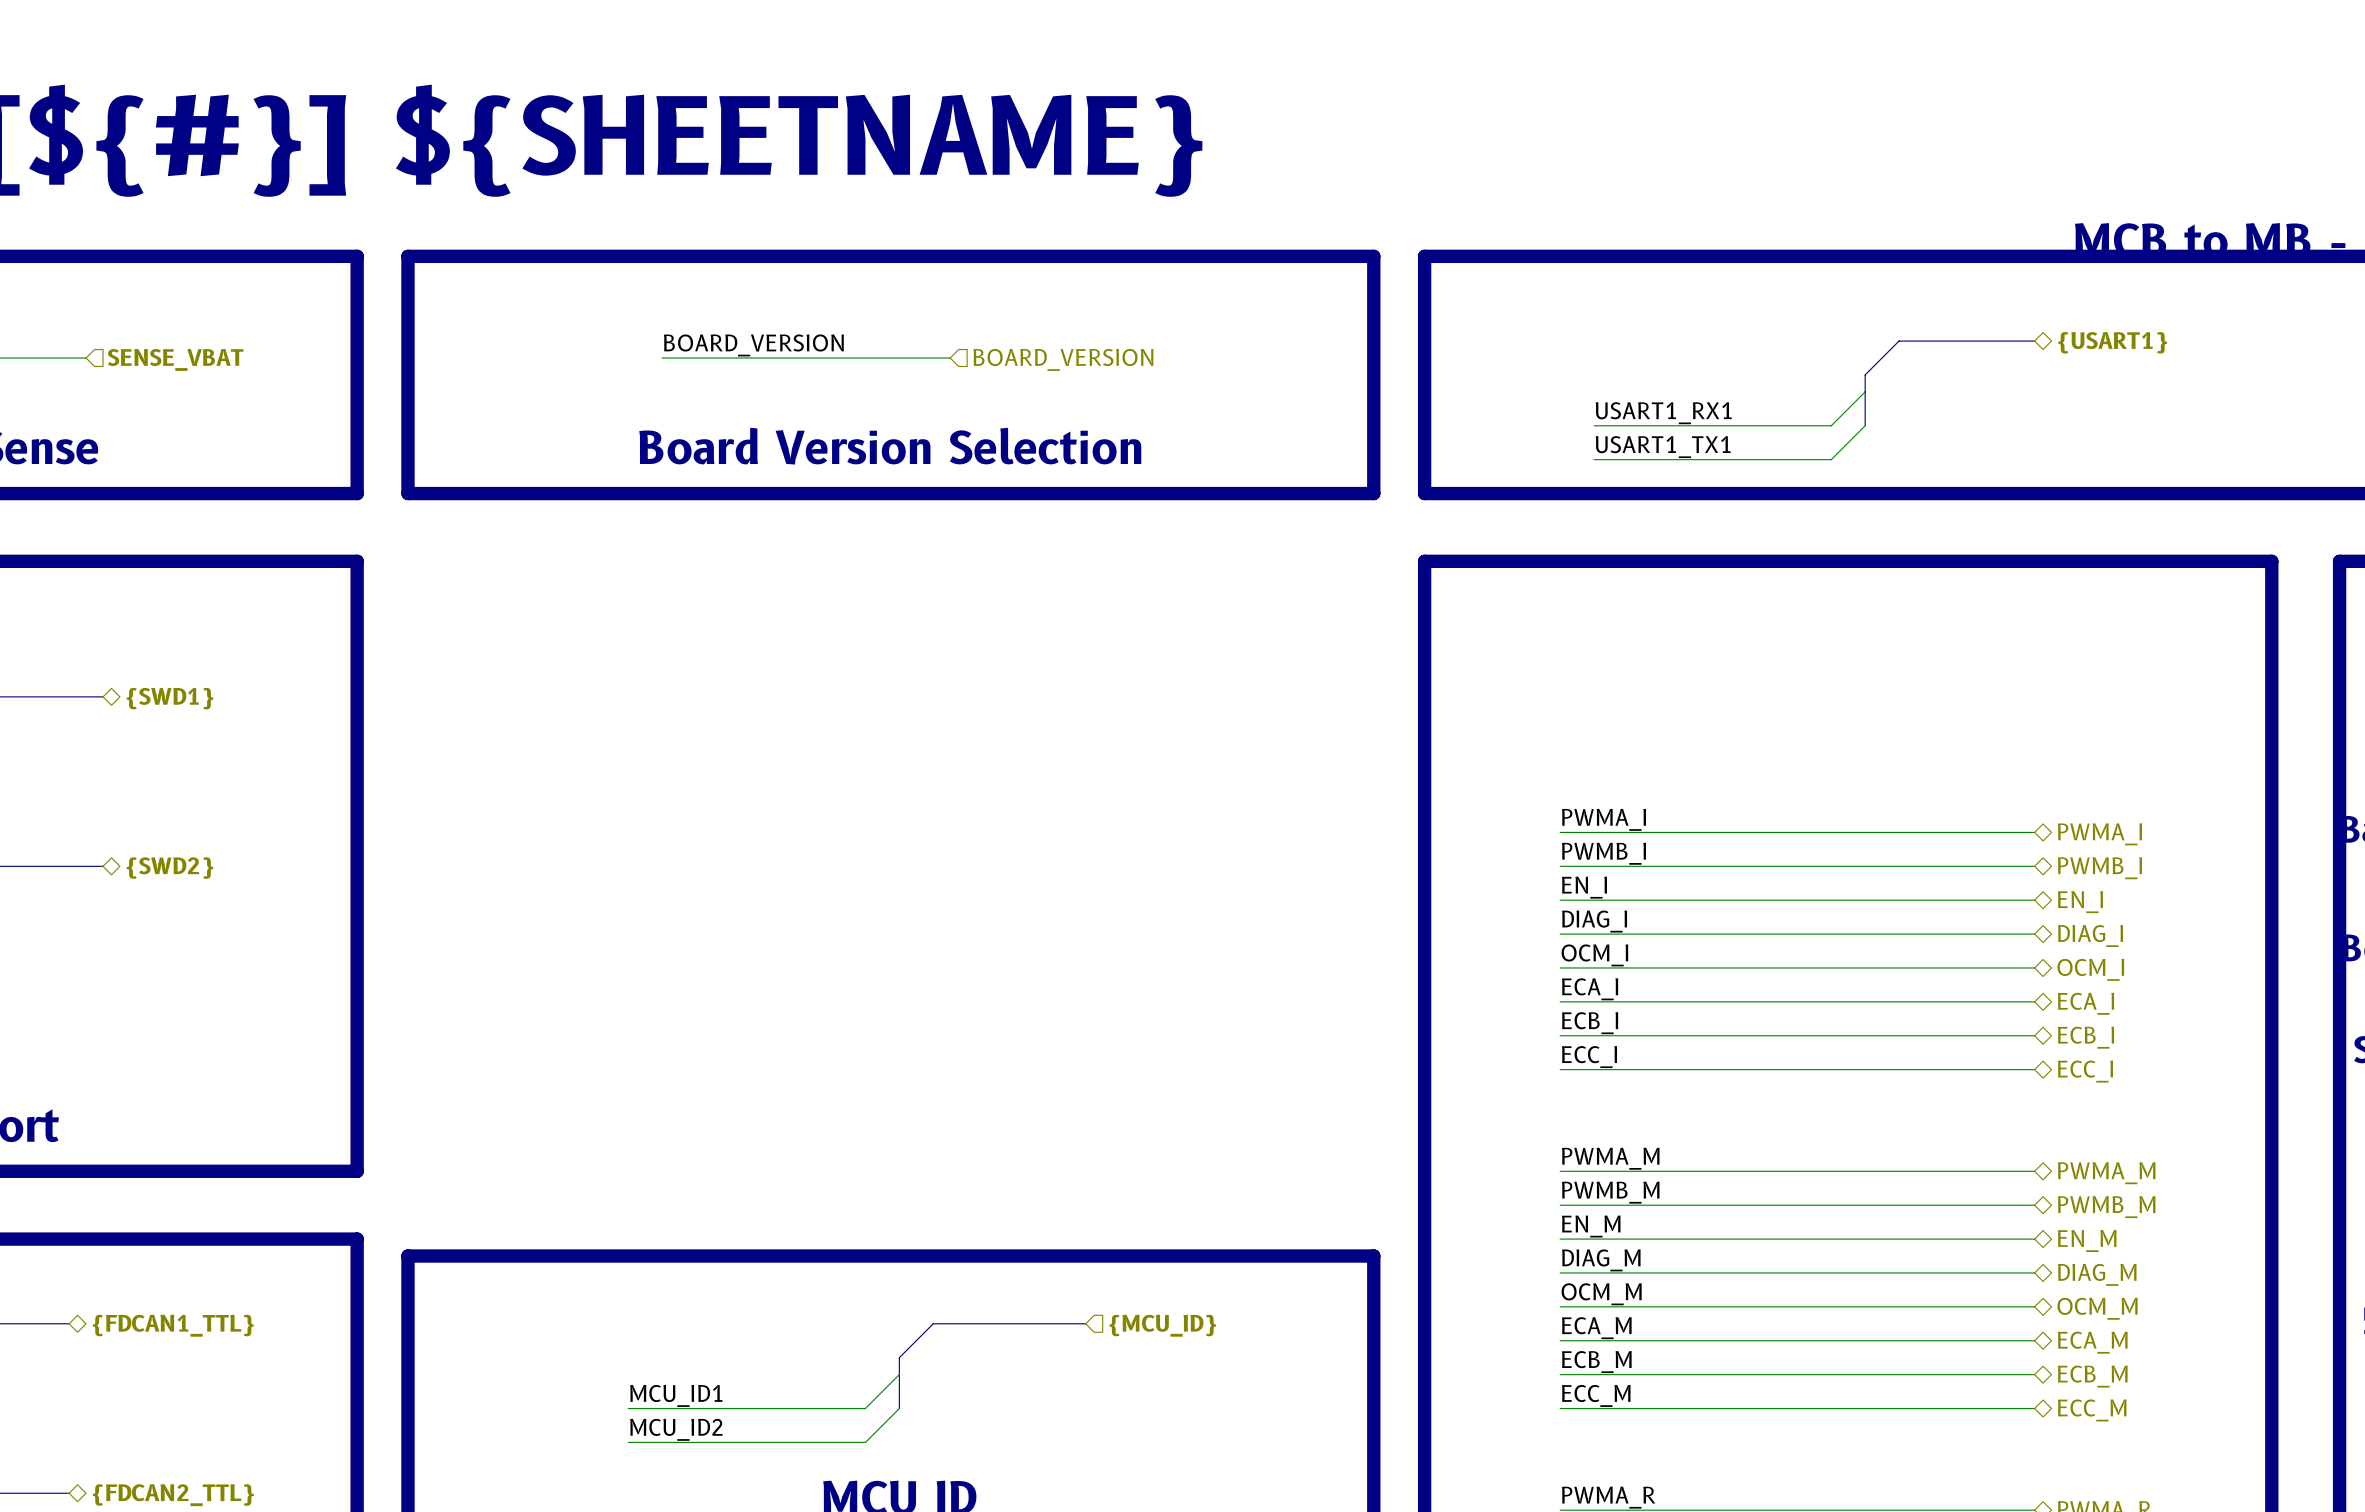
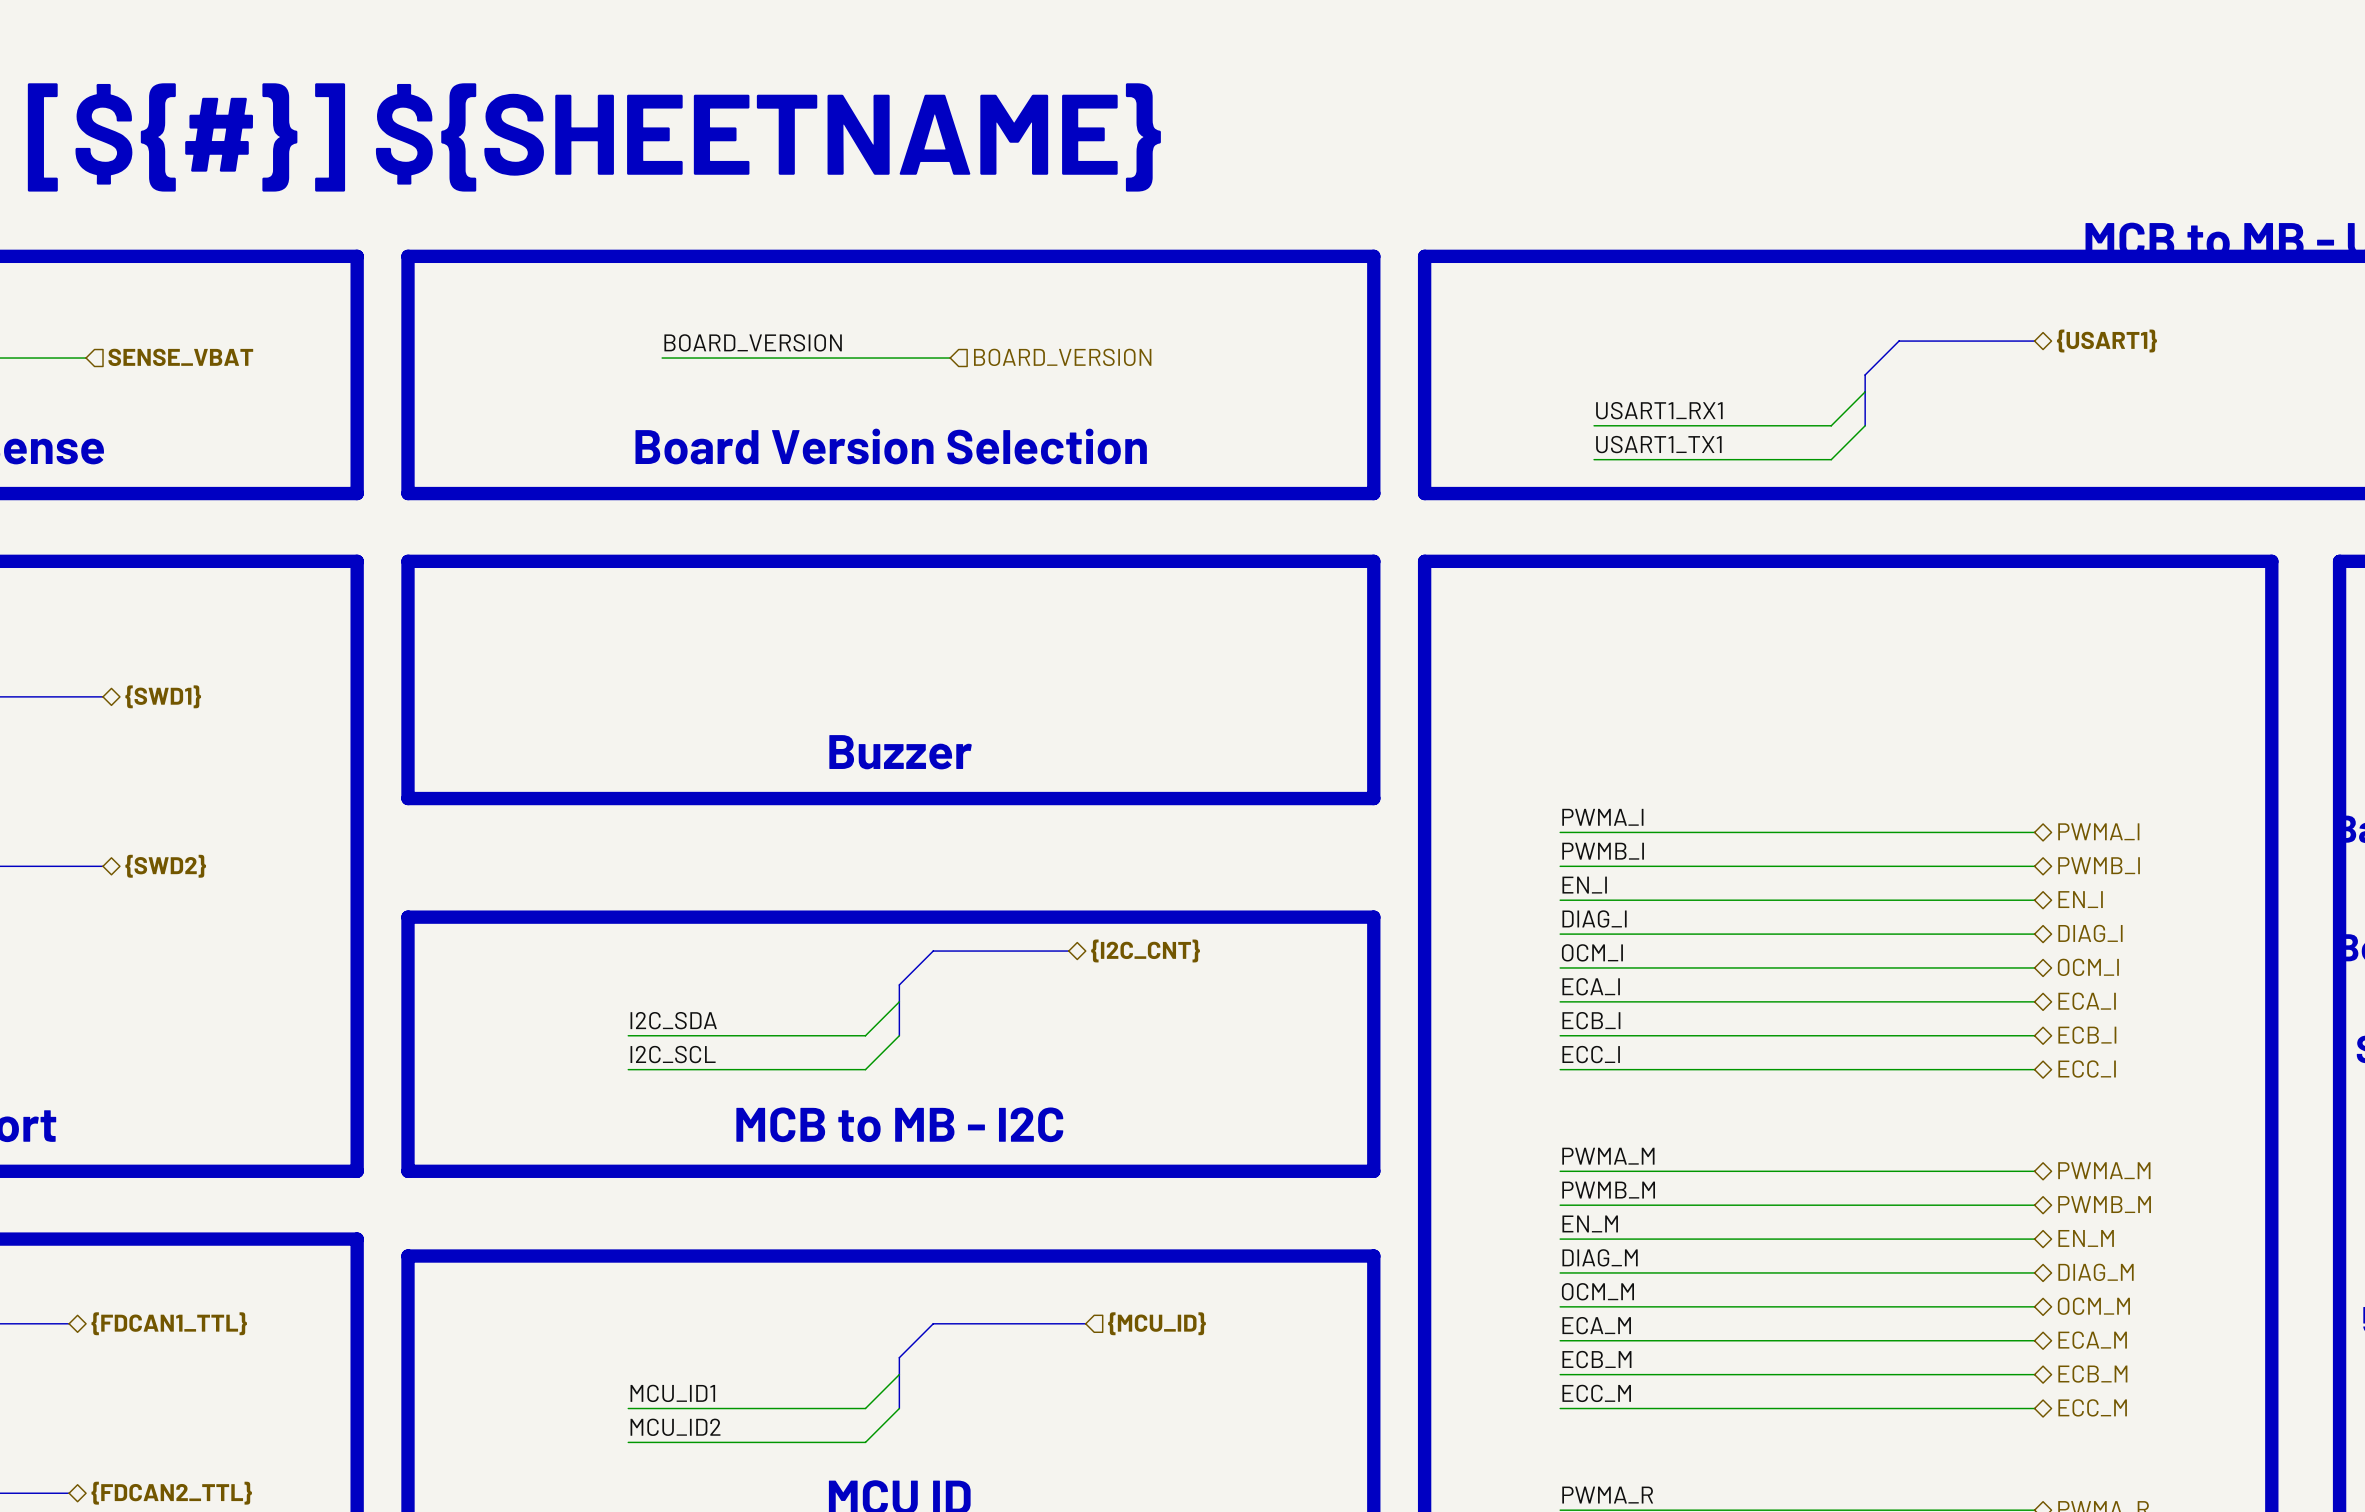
line: none -> (407, 561) (1373, 561) (1373, 798) (407, 798) (407, 561)
text: none -> Buzzer (900, 752)
line: none -> (407, 917) (407, 1171) (1373, 1171) (1373, 917) (407, 917)
bus: none -> (1068, 951) (933, 951) (899, 984) (899, 1035)
hierarchical label: none -> {I2C_CNT} (1145, 950)
wire: none -> (899, 1001) (865, 1035) (628, 1035)
label: none -> I2C_SDA (673, 1020)
wire: none -> (899, 1035) (865, 1069) (628, 1069)
label: none -> I2C_SCL (673, 1054)
text: none -> MCB to MB - I2C (899, 1124)

